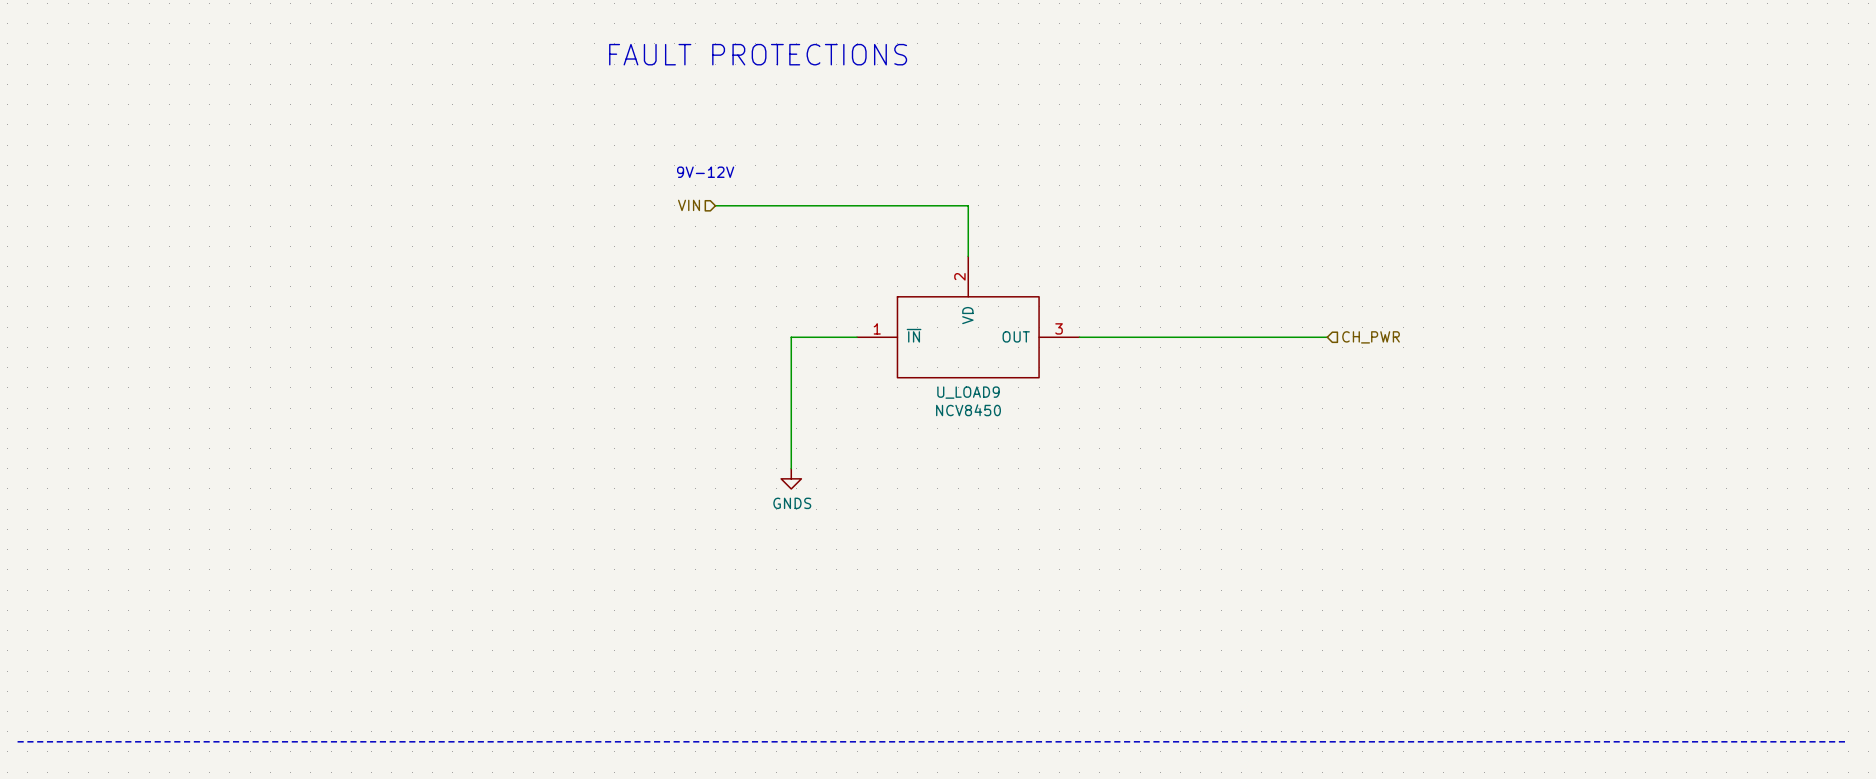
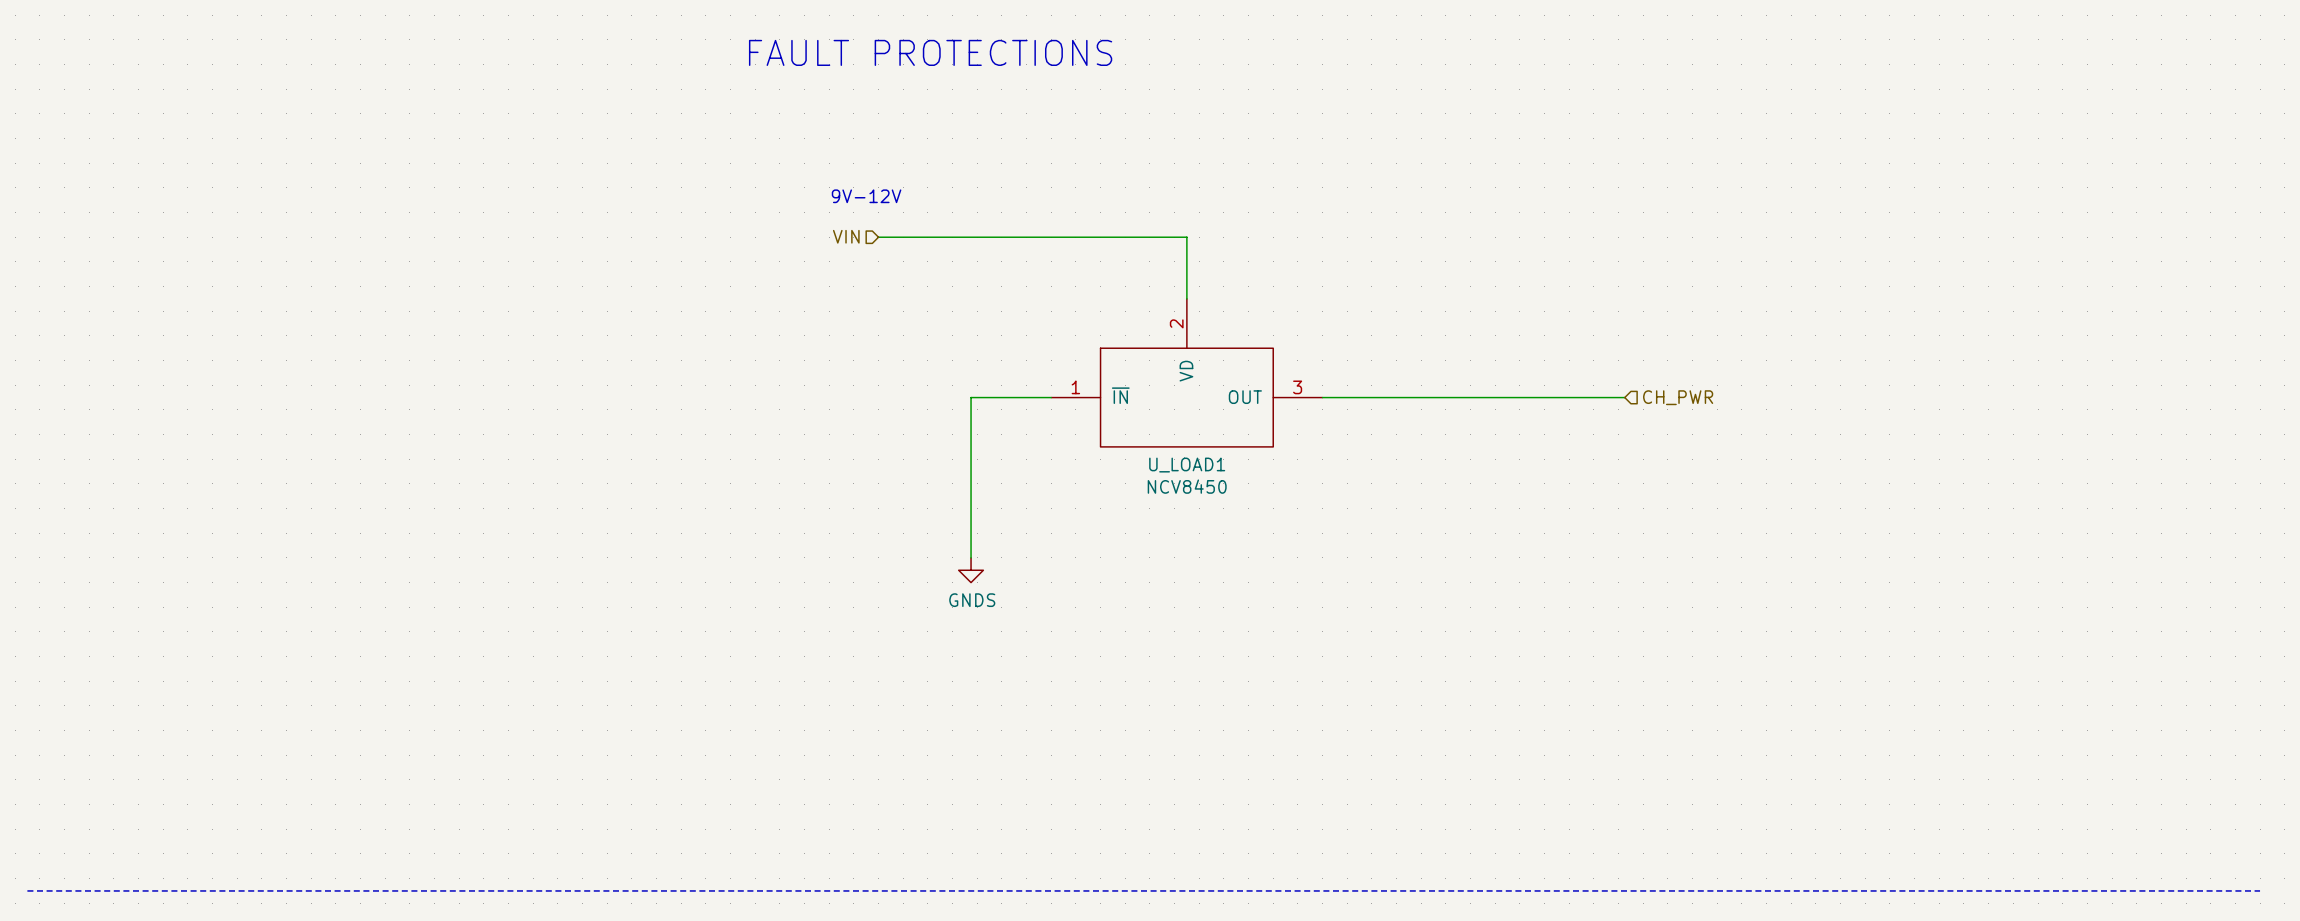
U_LOAD9 name: U_LOAD9 (968, 392) -> U_LOAD1 (1187, 465)

